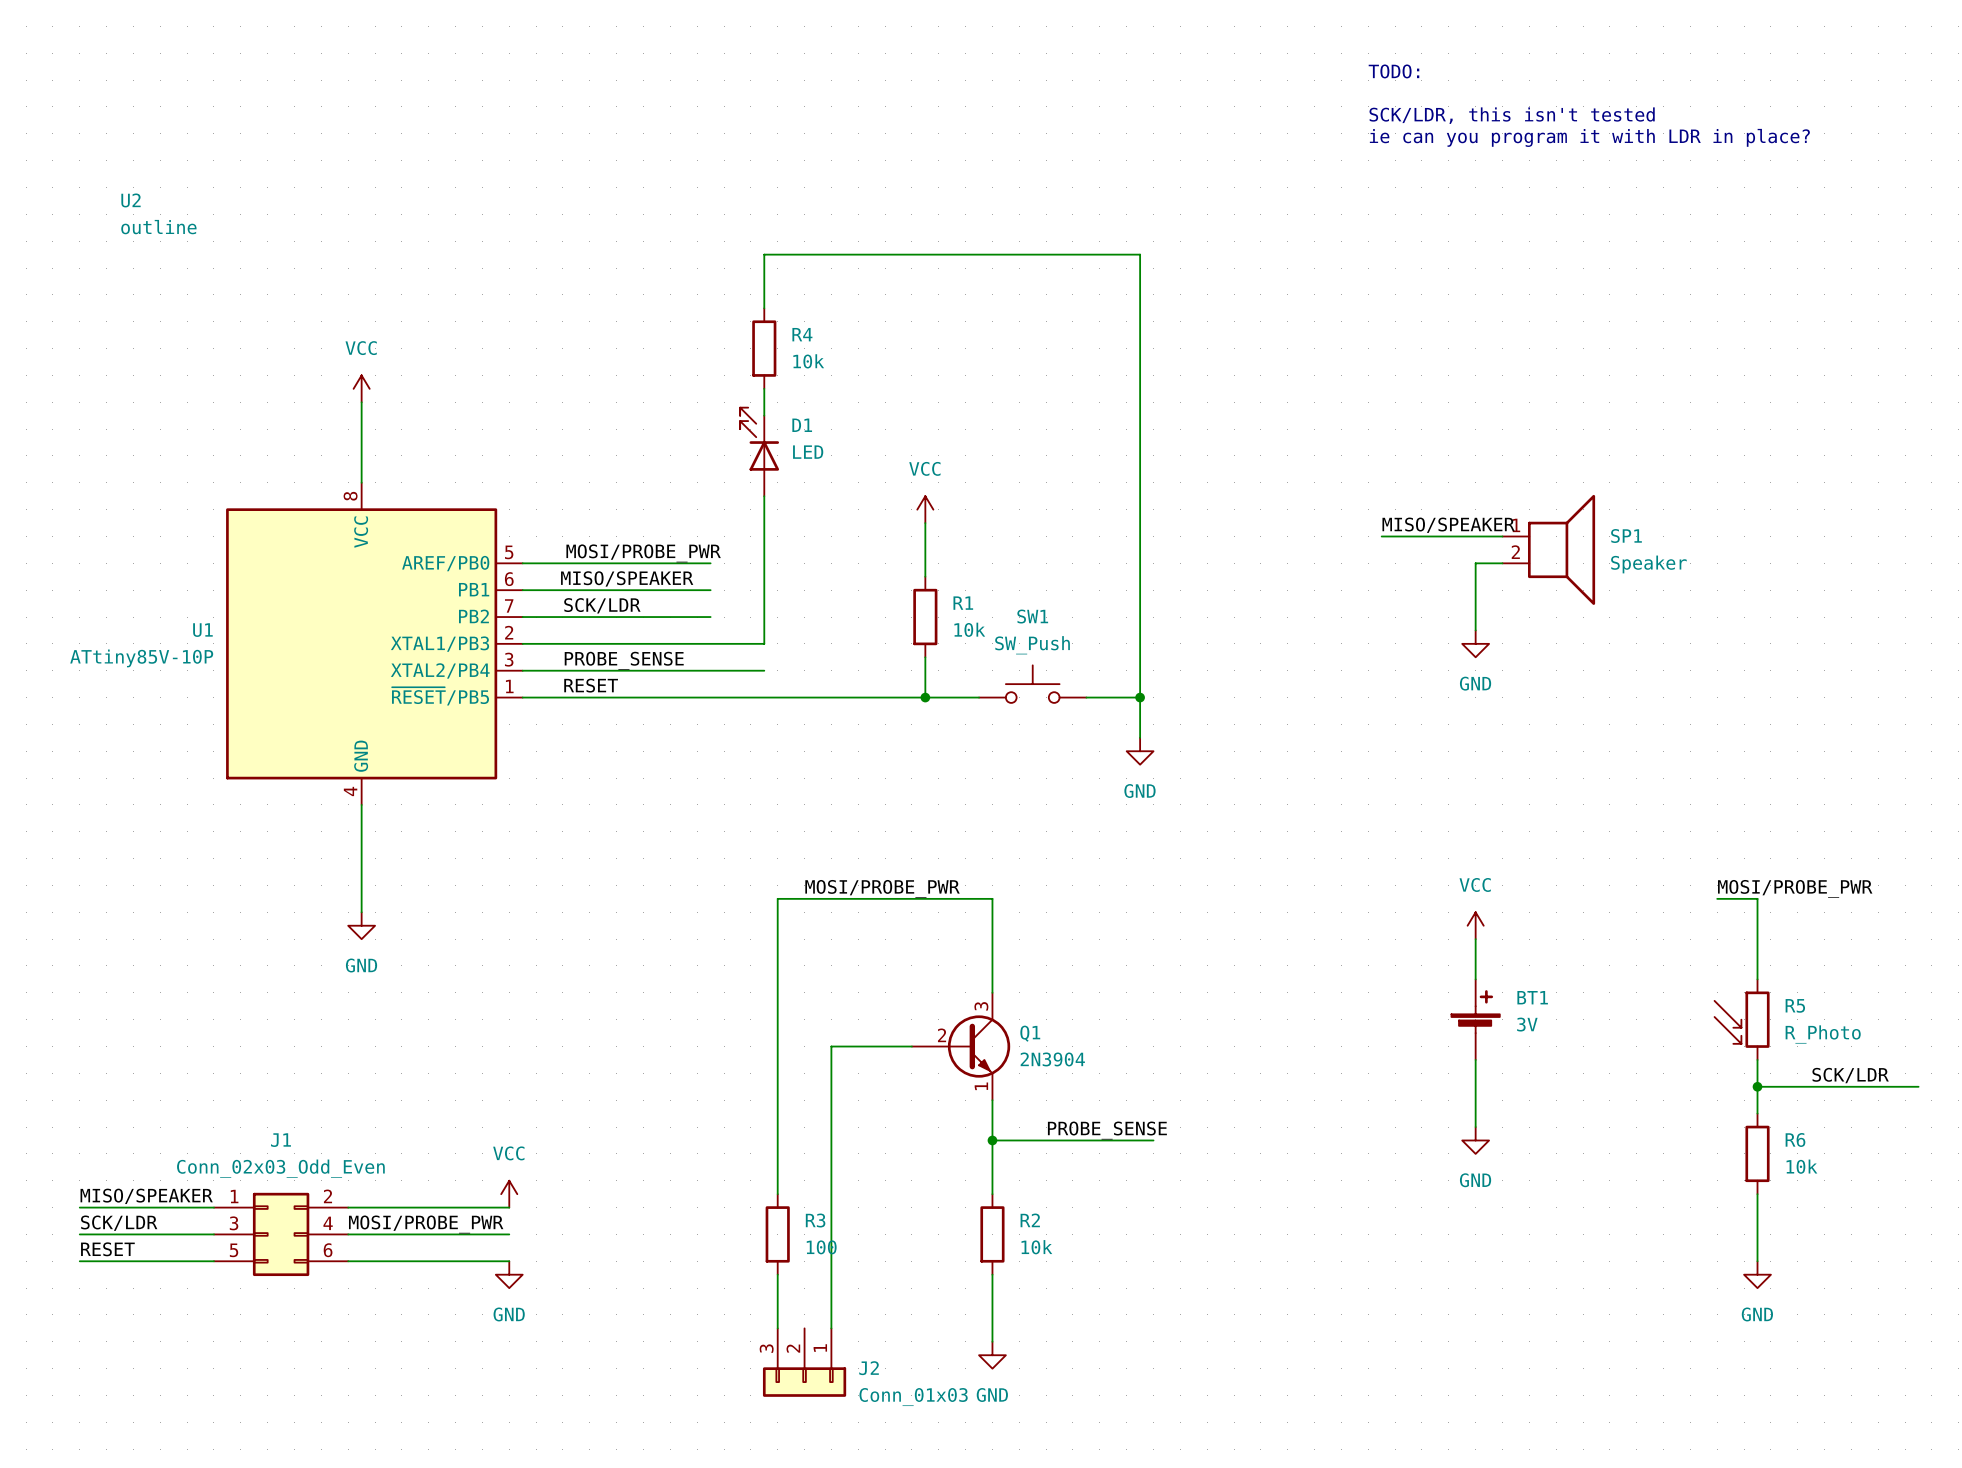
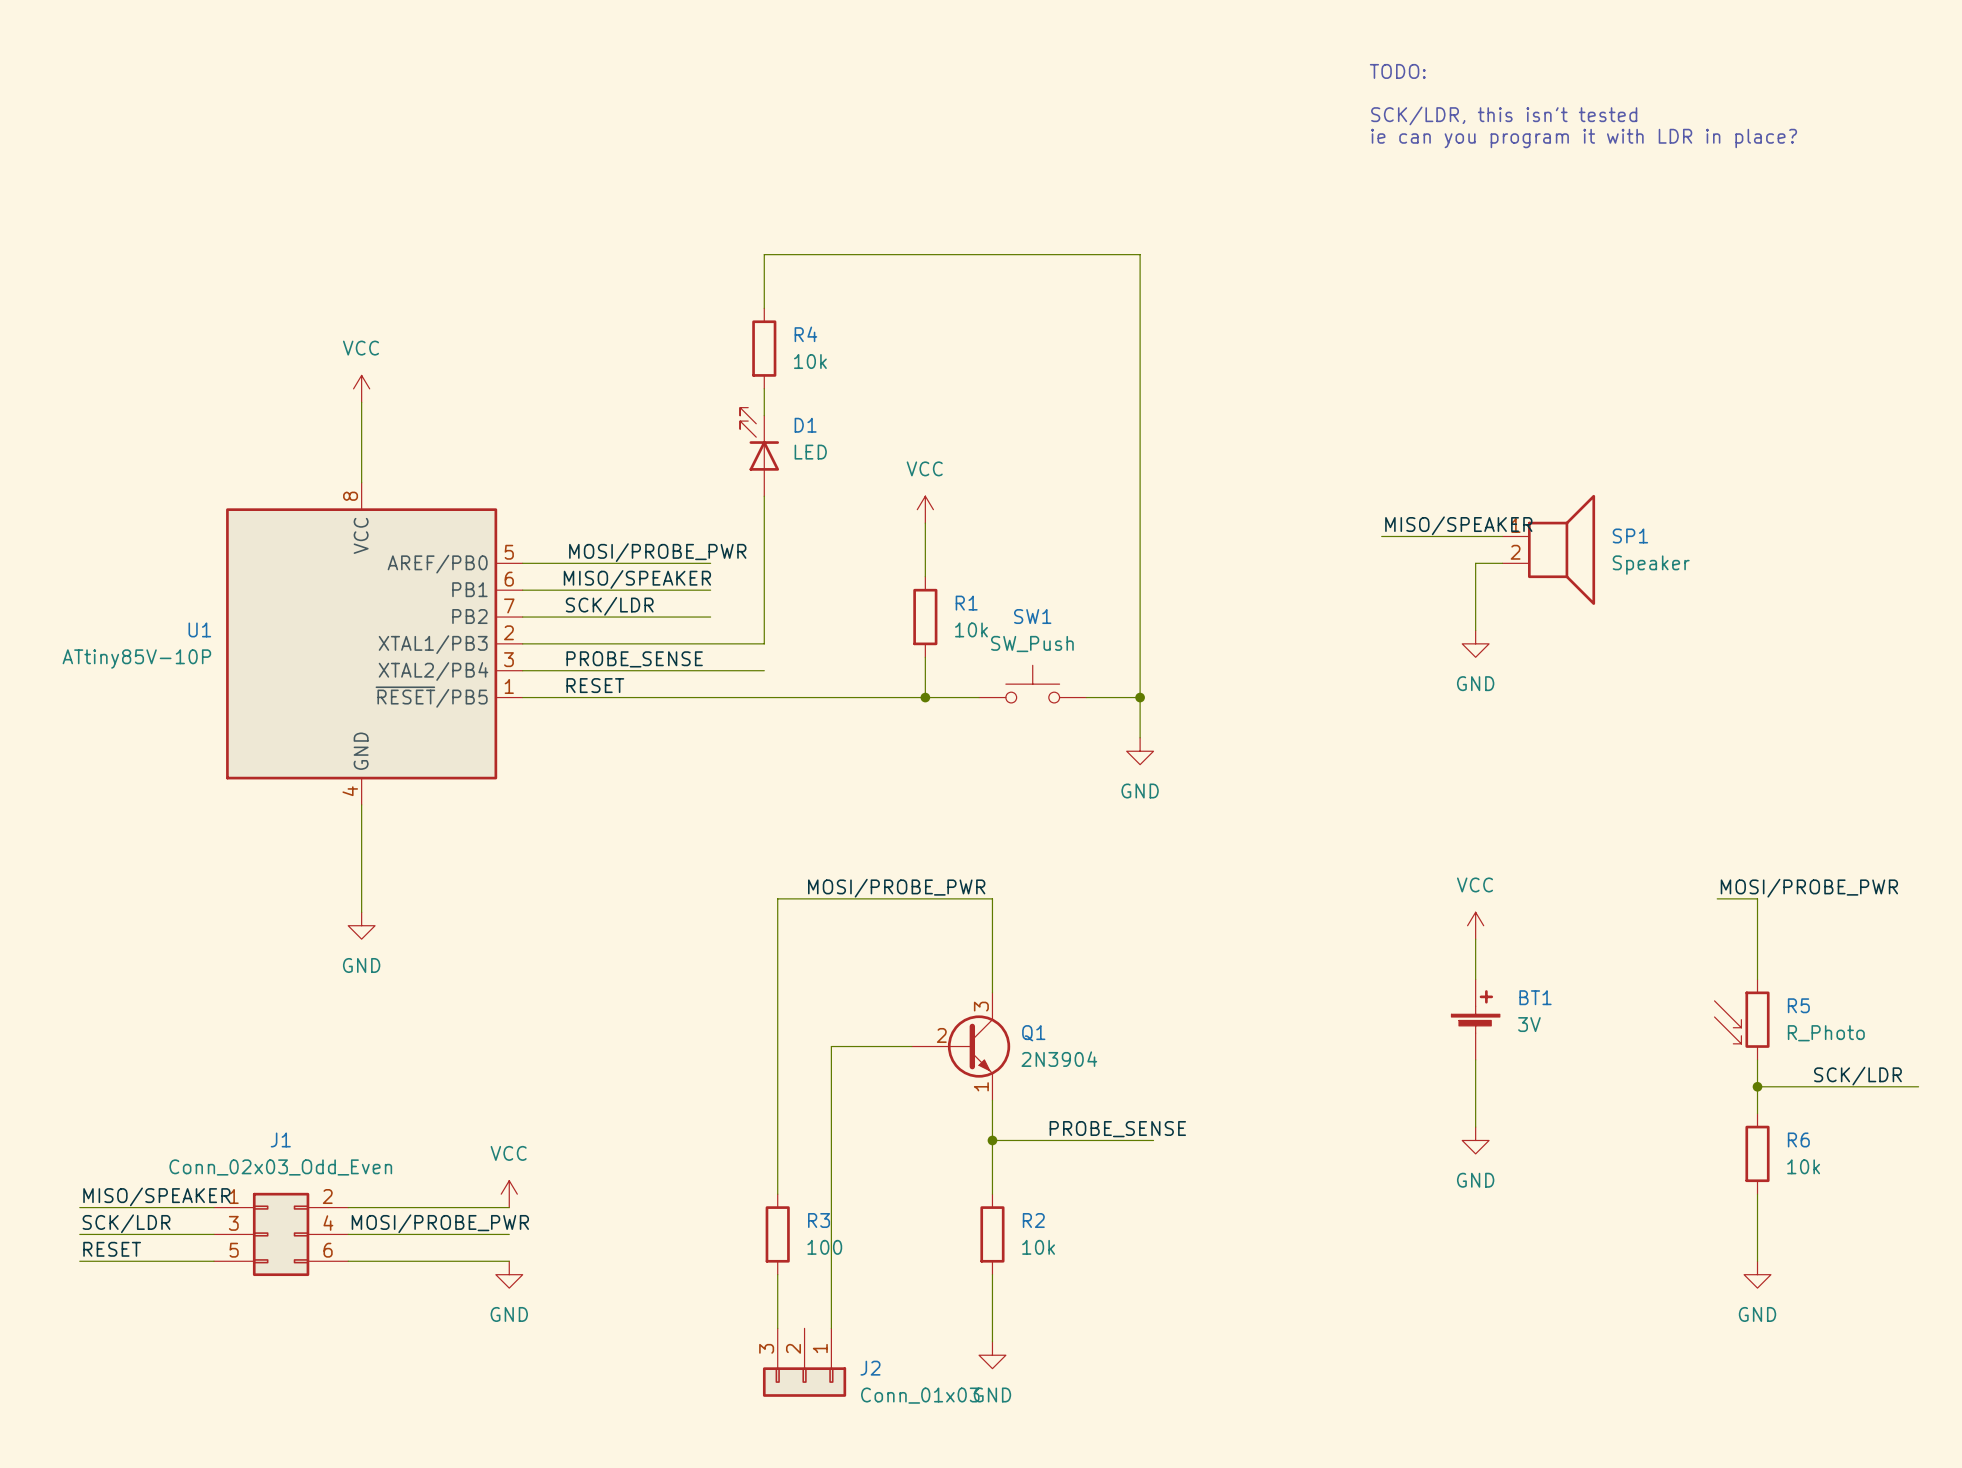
U2: outline (158, 213) -> none

